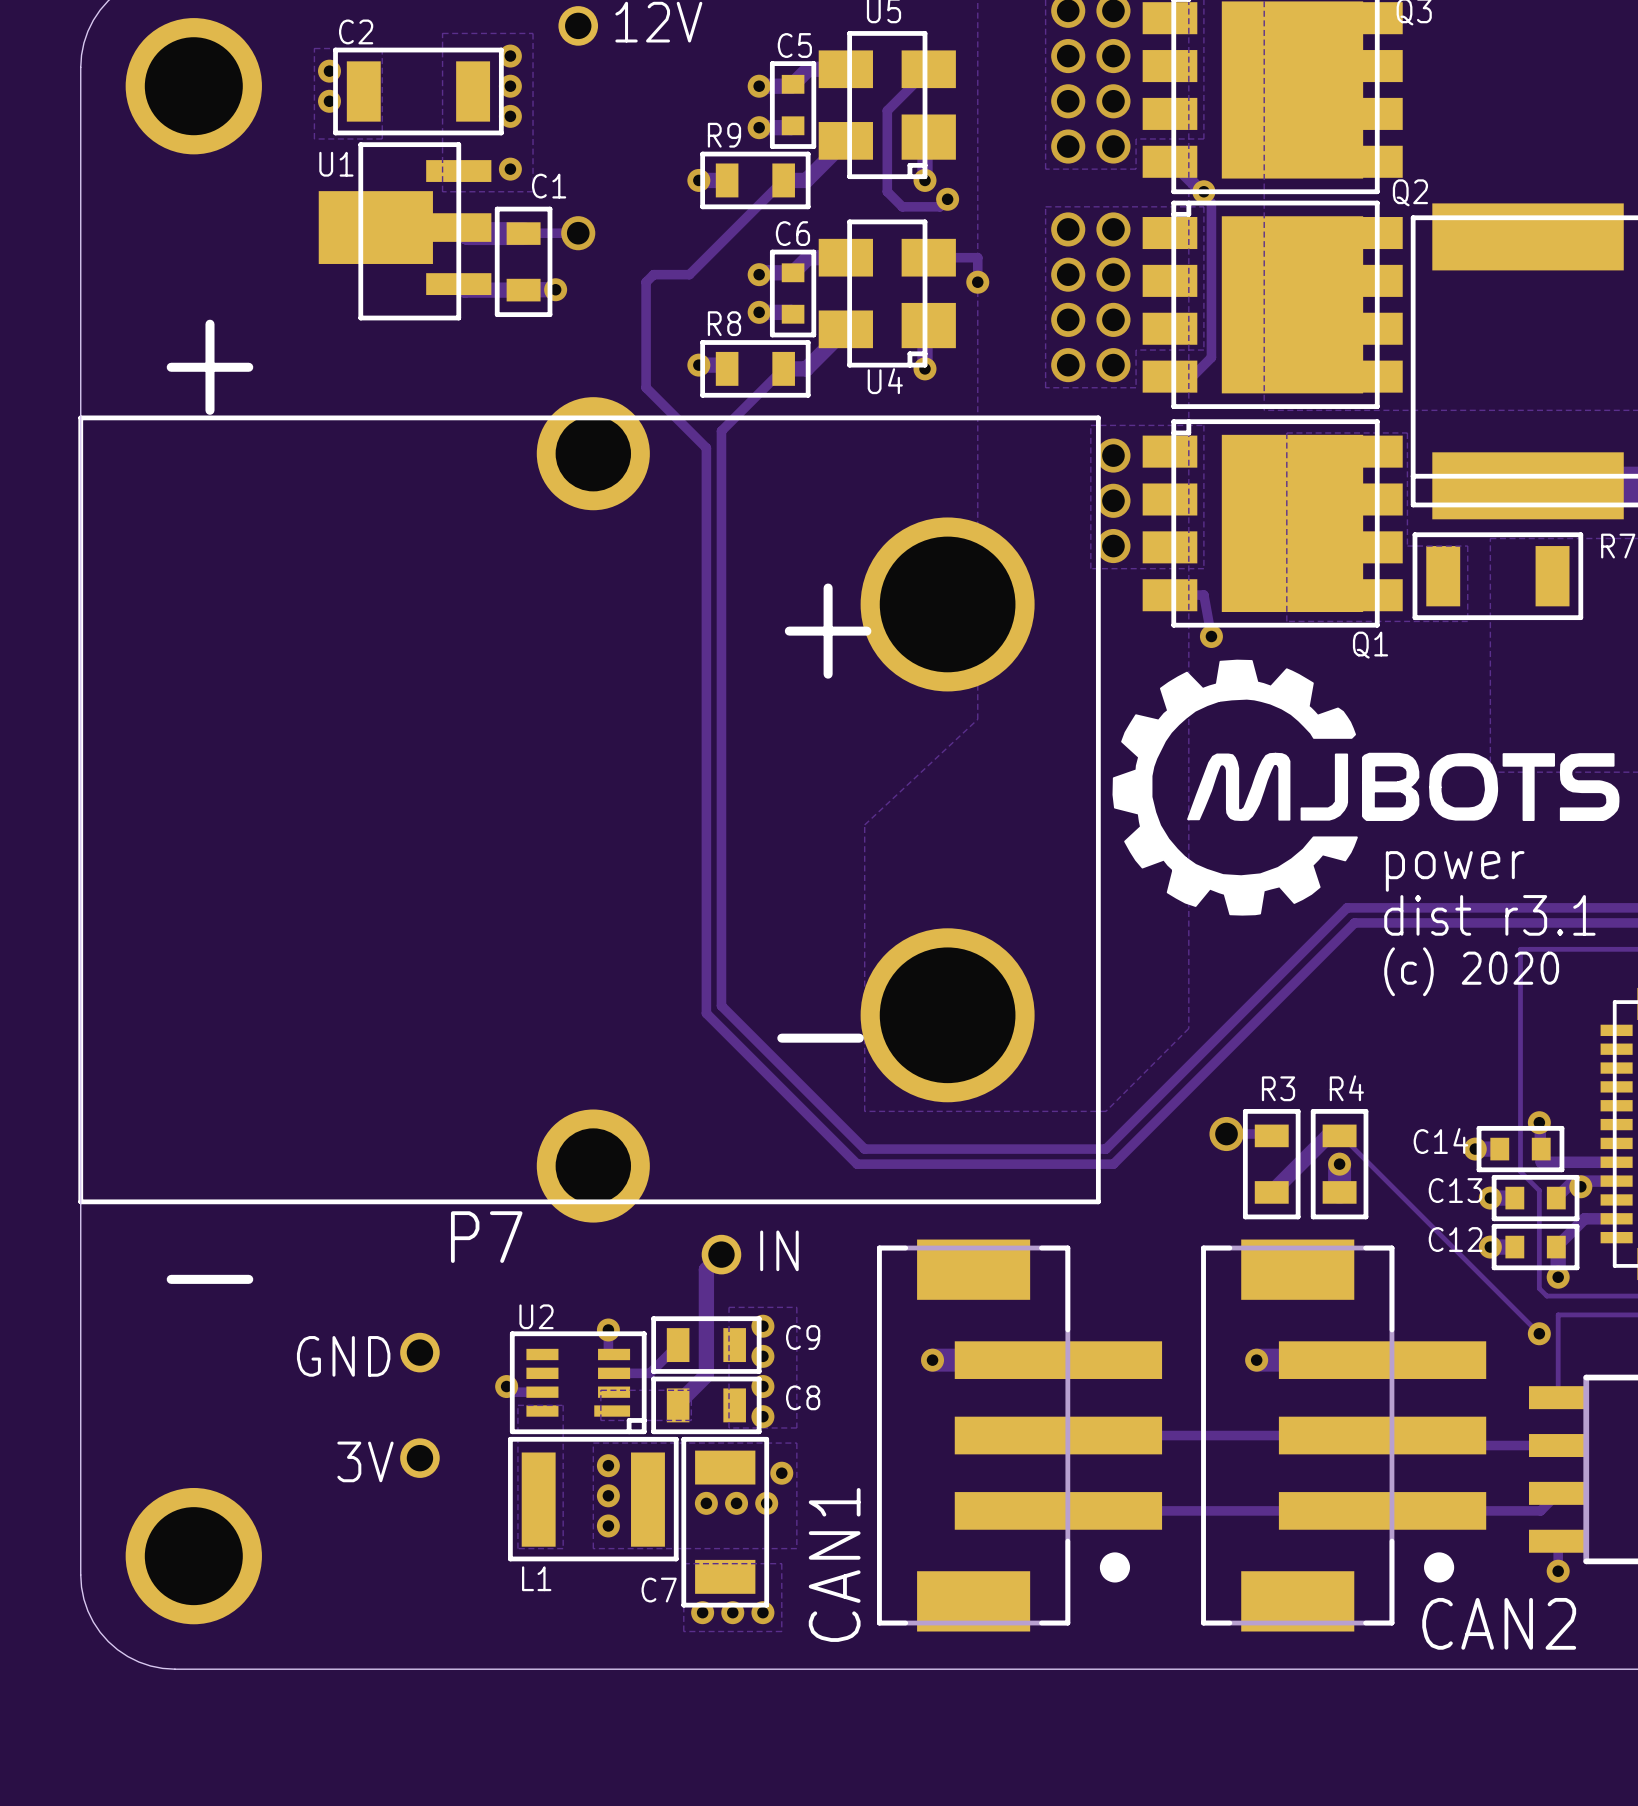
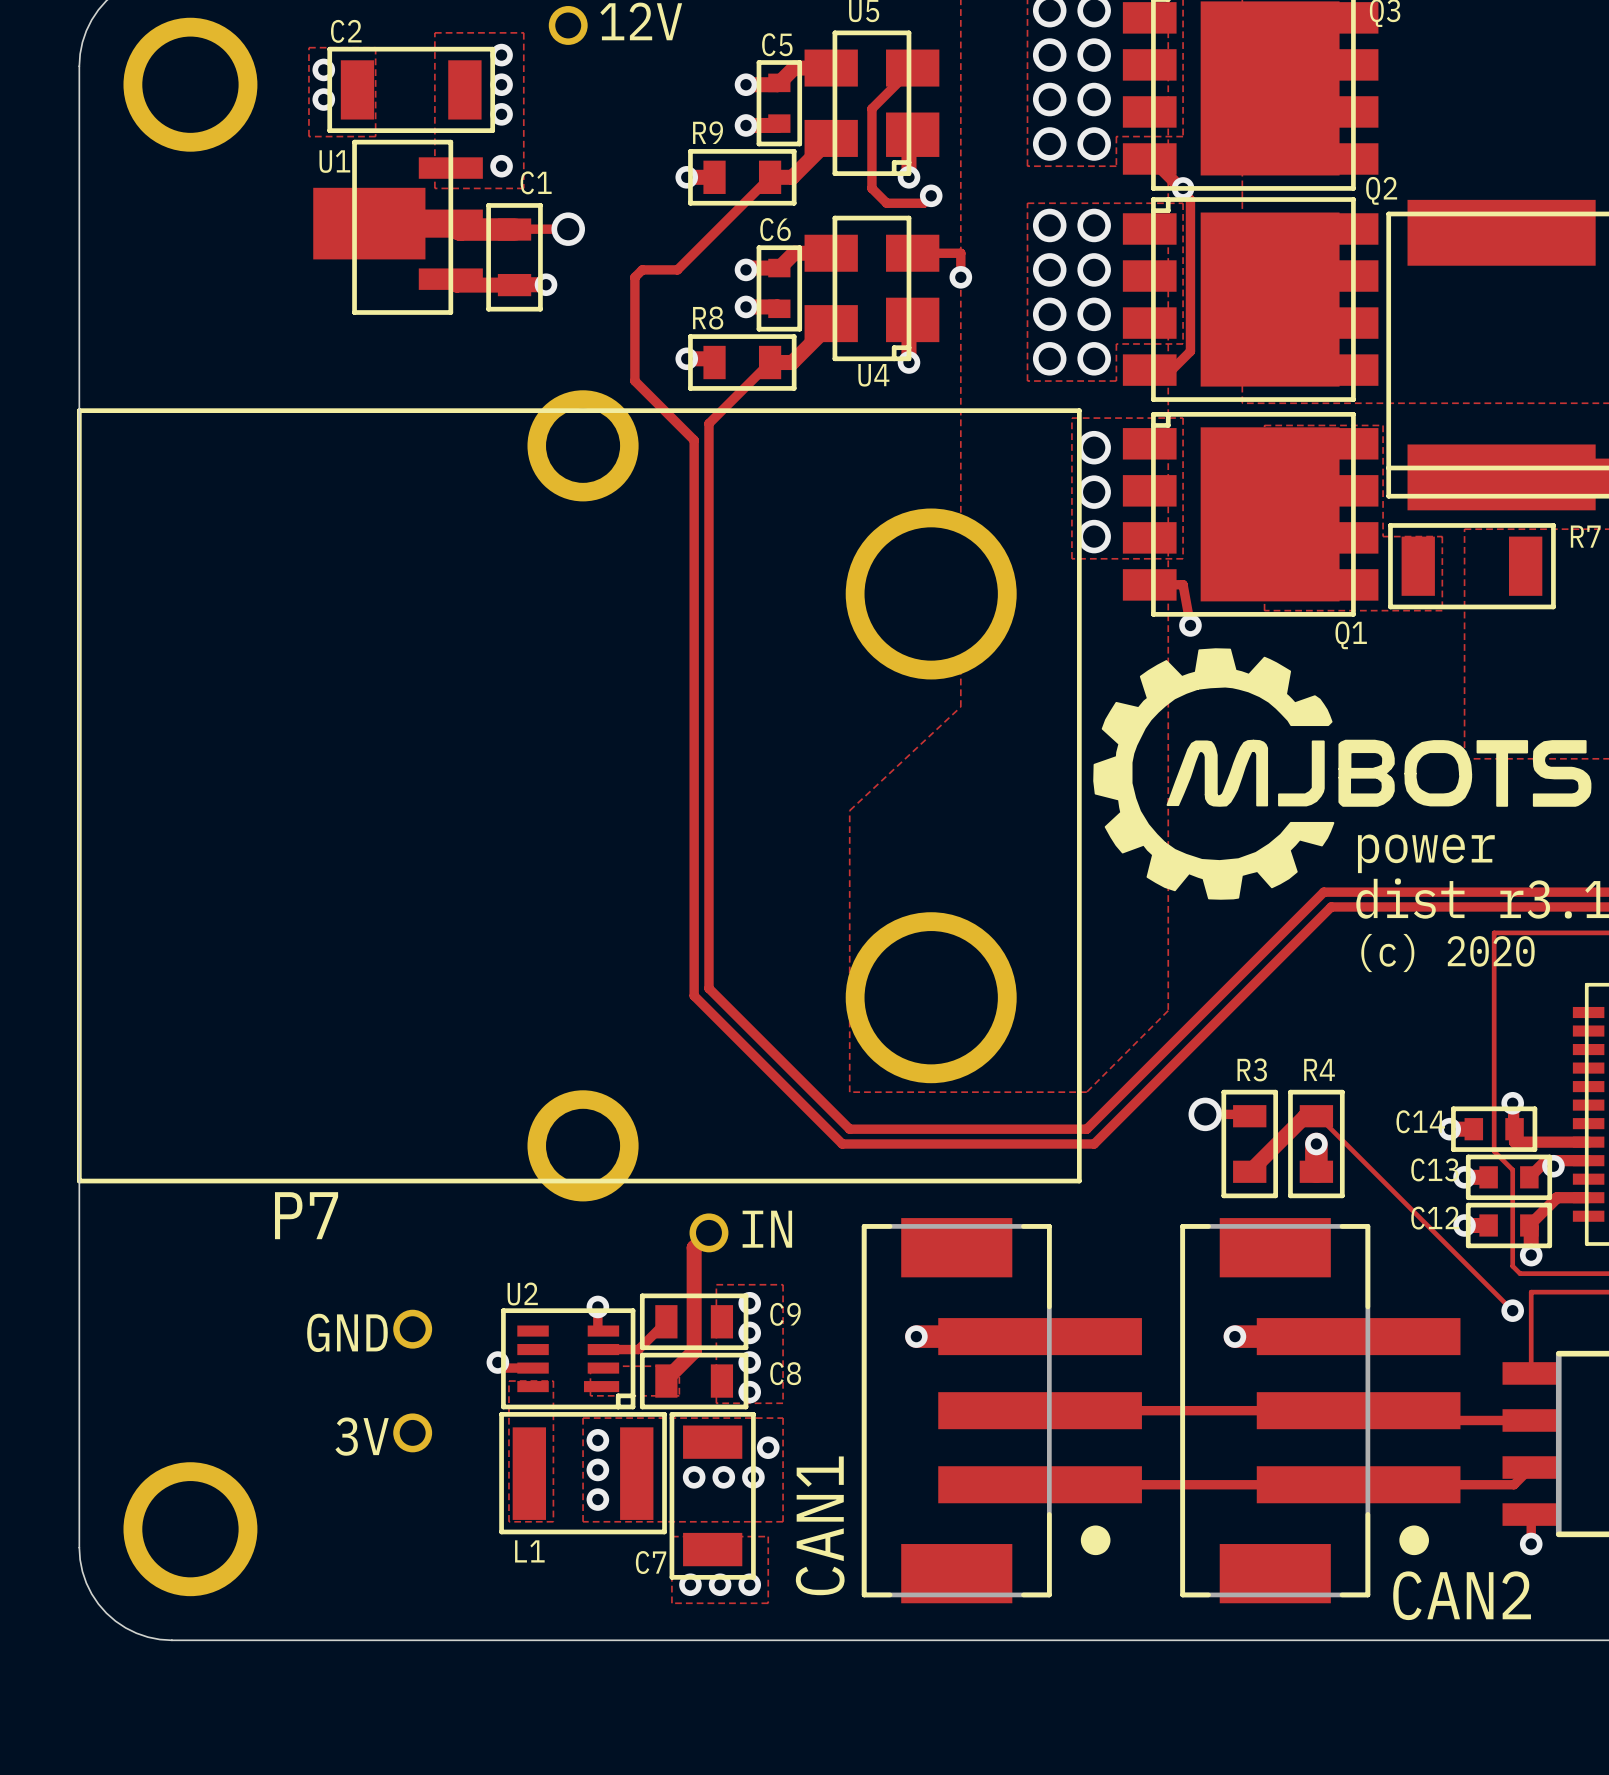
text: + (209, 367) -> none
text: + (828, 631) -> none
text: - (820, 1038) -> none
P7 name position: P7 (486, 1237) -> P7 (306, 1215)
text: - (209, 1279) -> none

